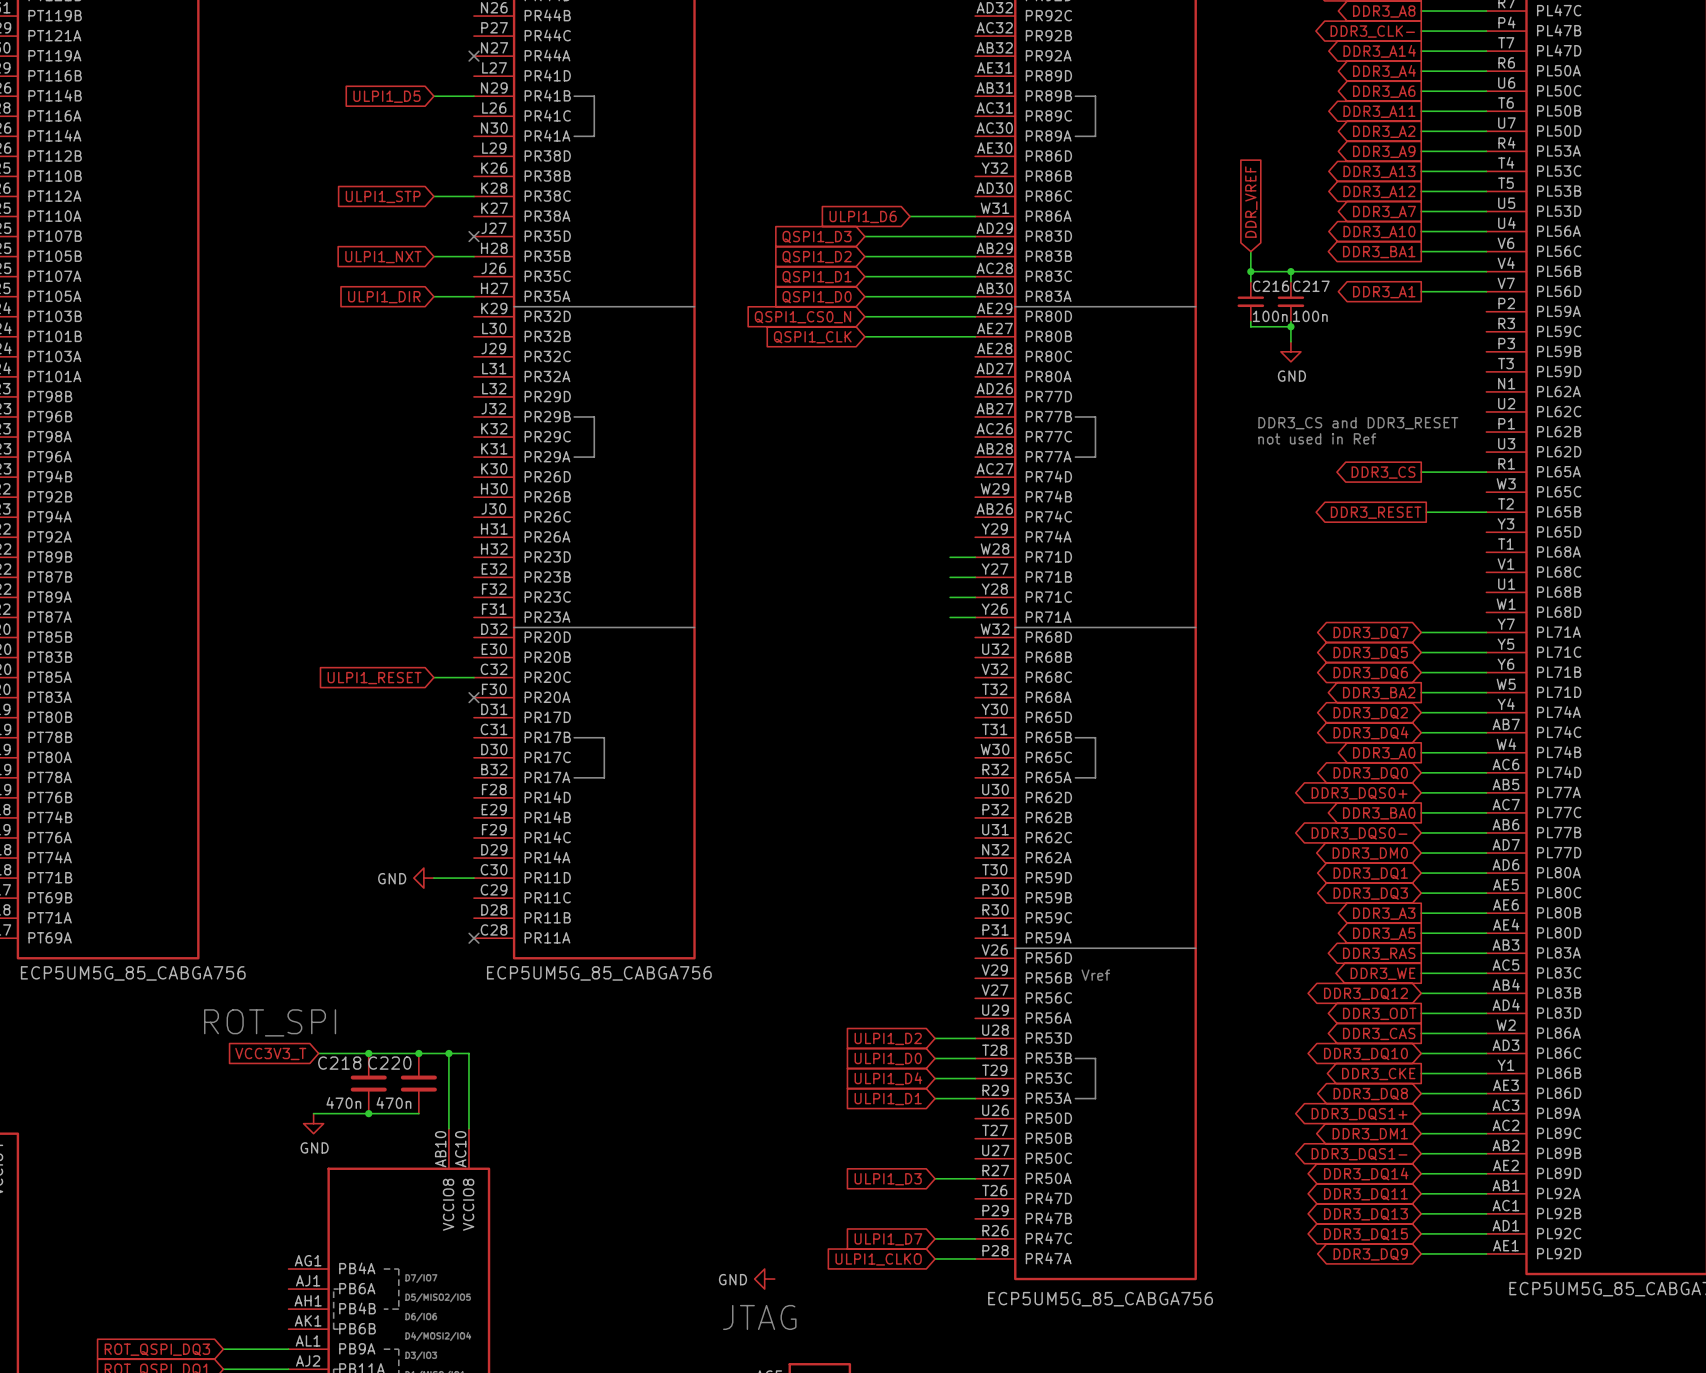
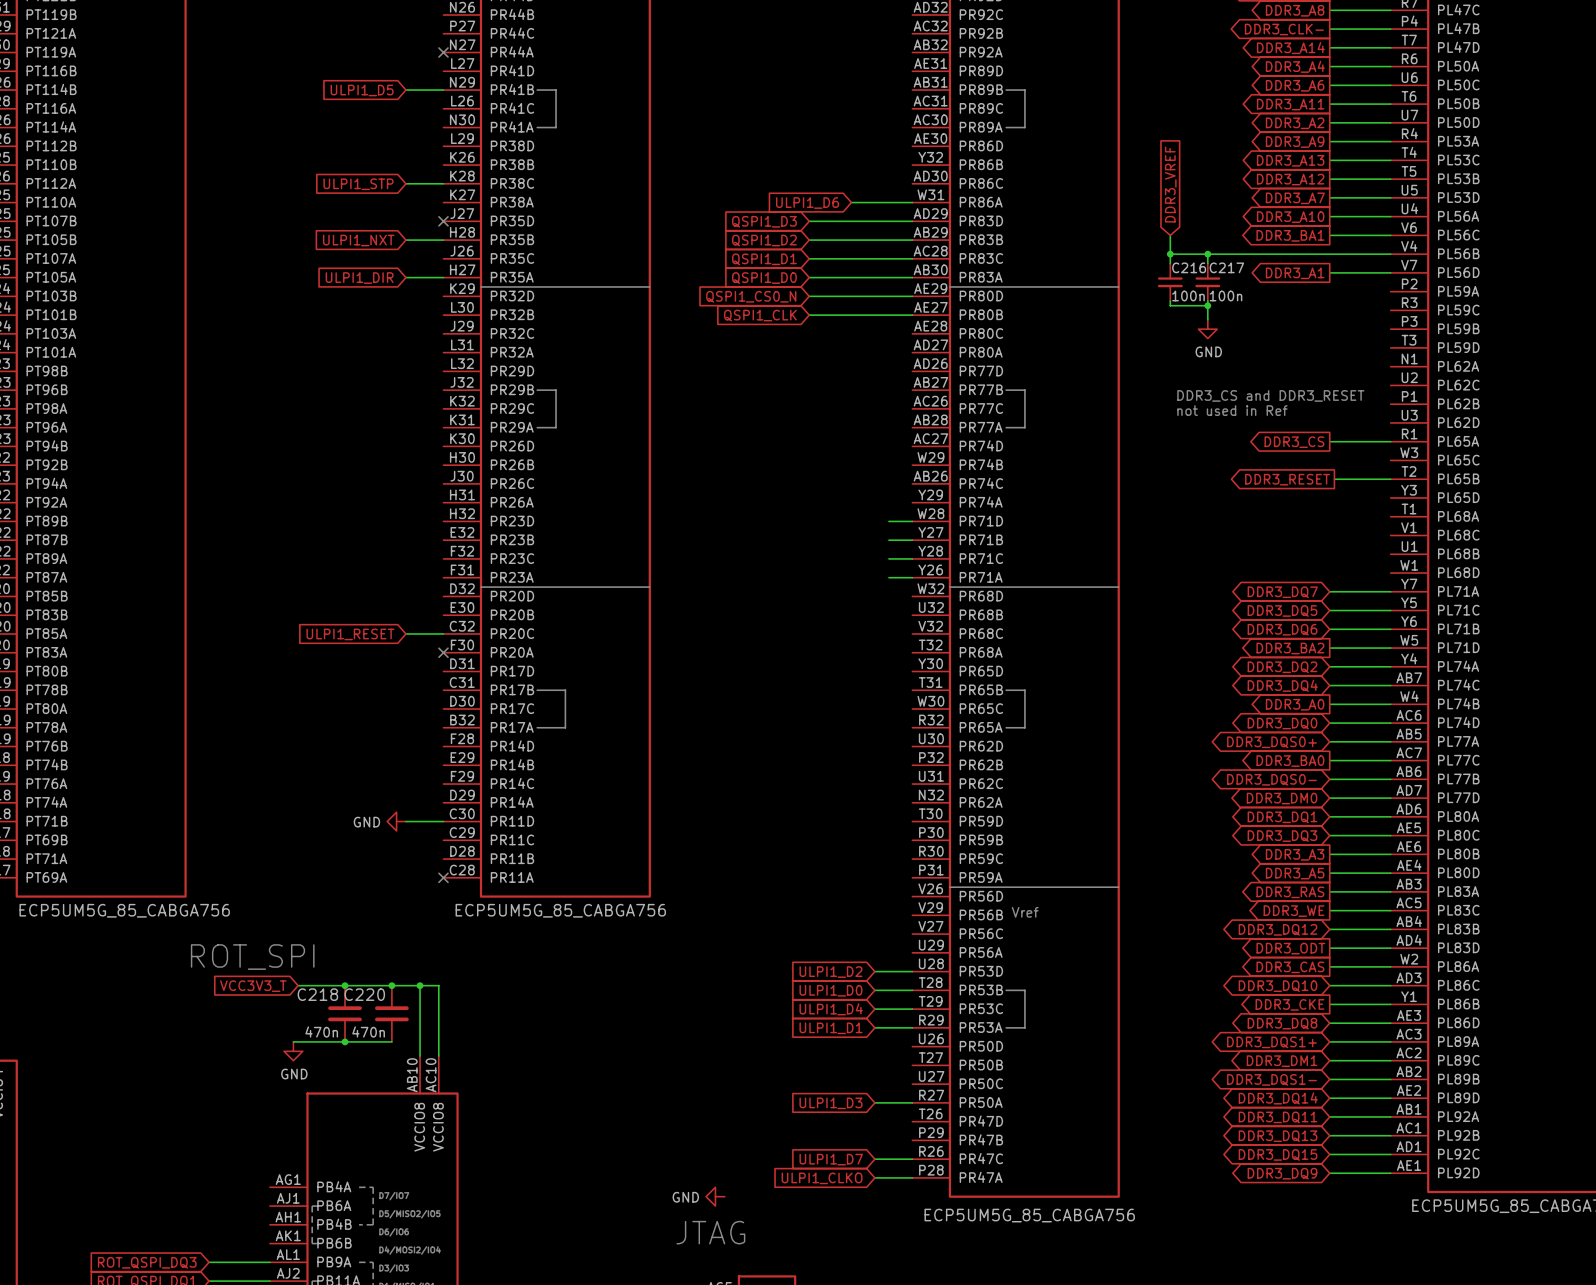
global label: DDR_VREF (1251, 202) -> DDR3_VREF (1170, 184)

